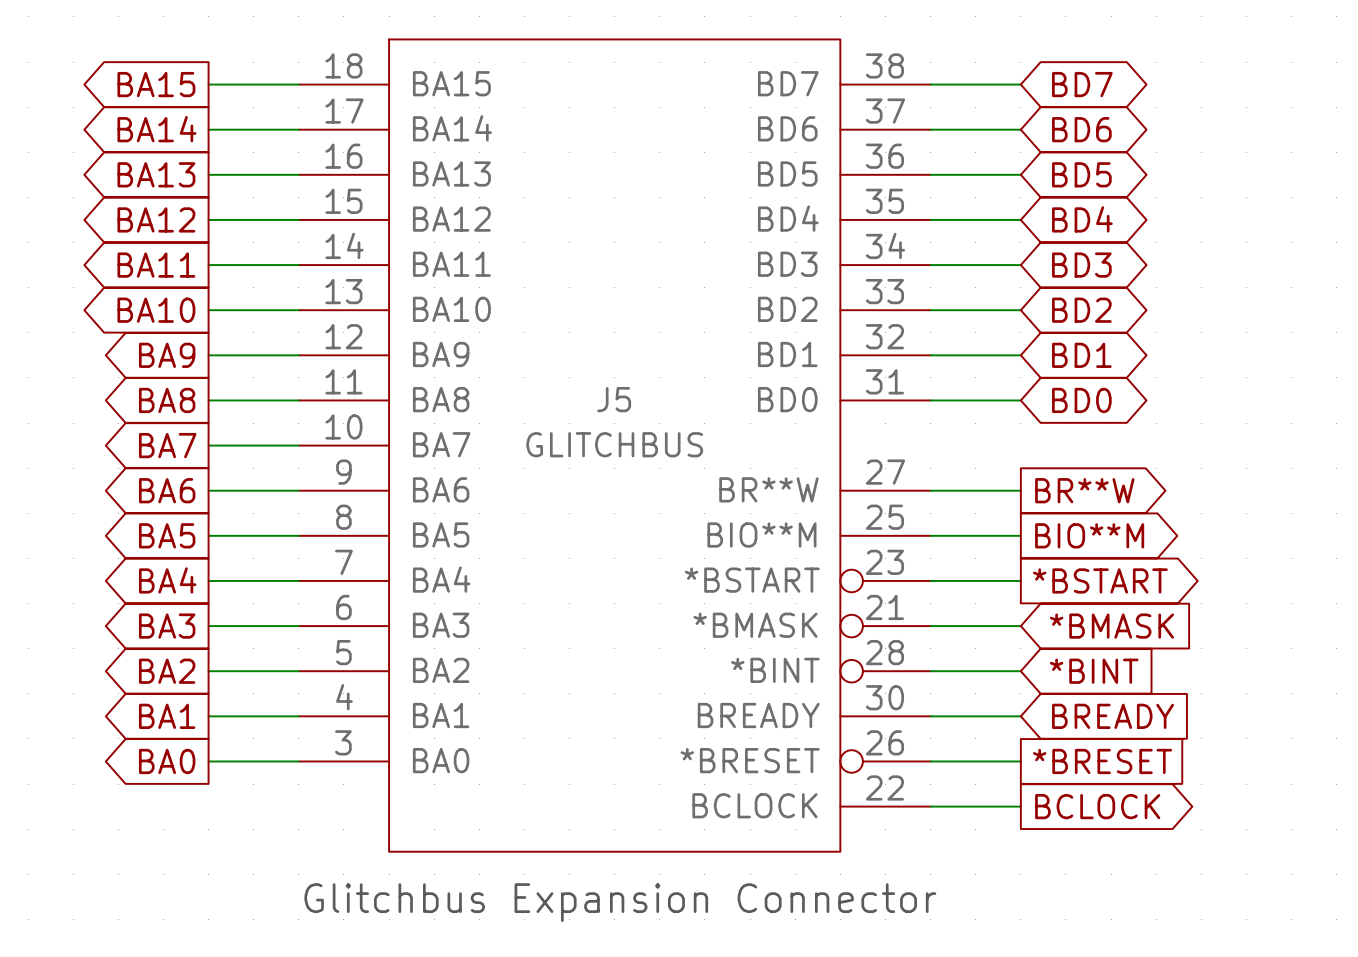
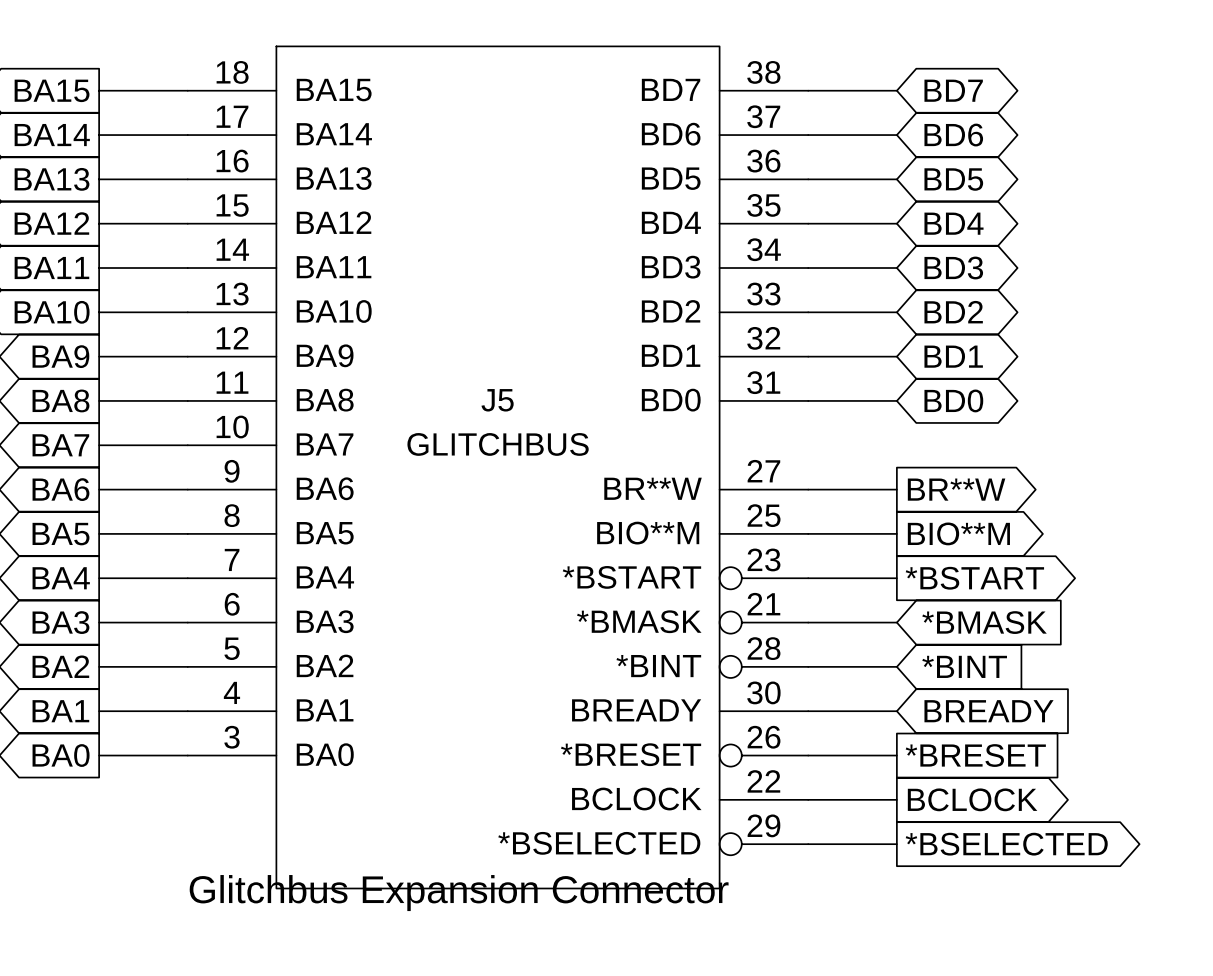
J5 symbol: [298, 39, 931, 852] -> [187, 46, 809, 889]
wire: none -> (808, 844) (896, 844)
global label: none -> *BSELECTED (1006, 844)

